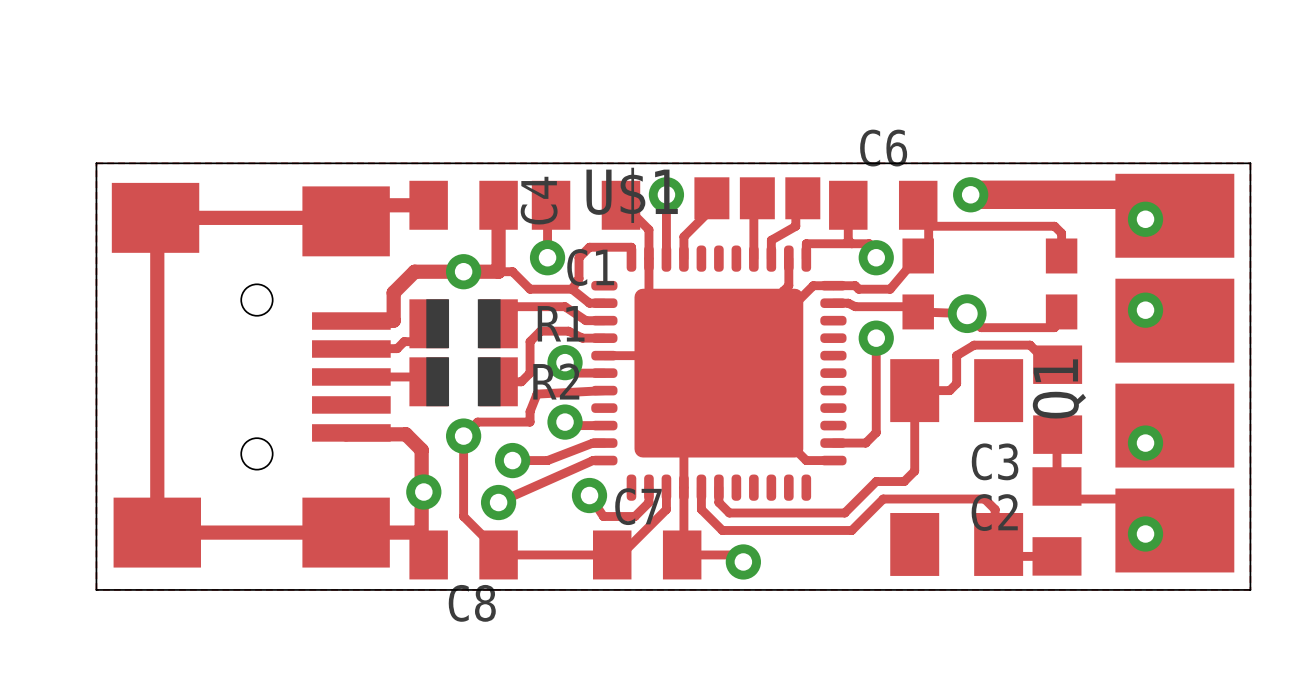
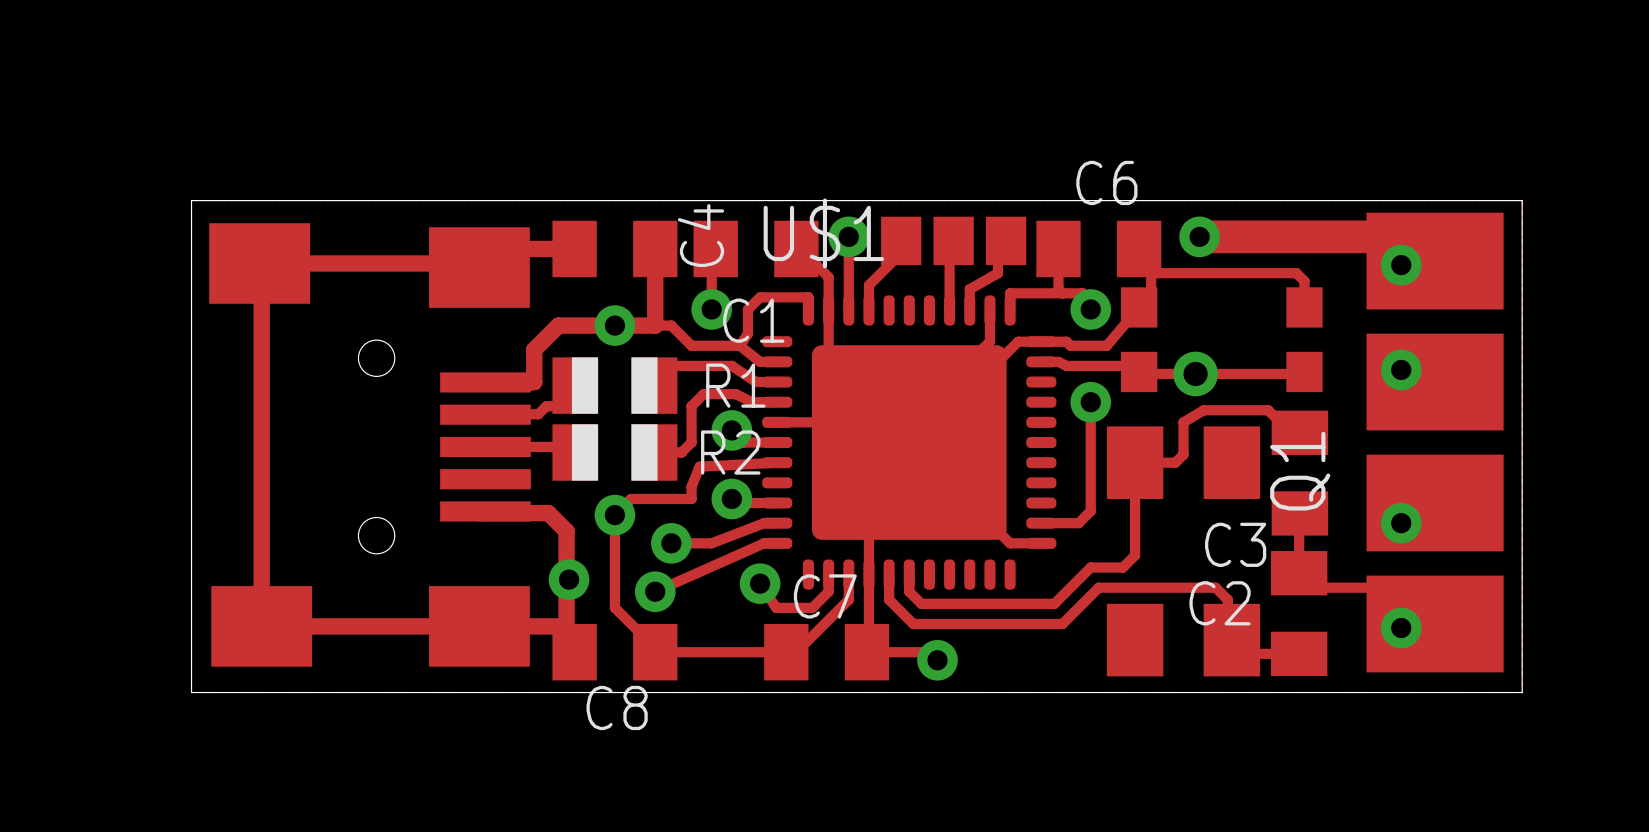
track: (918, 311) (967, 313) (981, 327) (1054, 327) (1061, 311) -> (1139, 371) (1141, 373) (1300, 373) (1304, 371)

